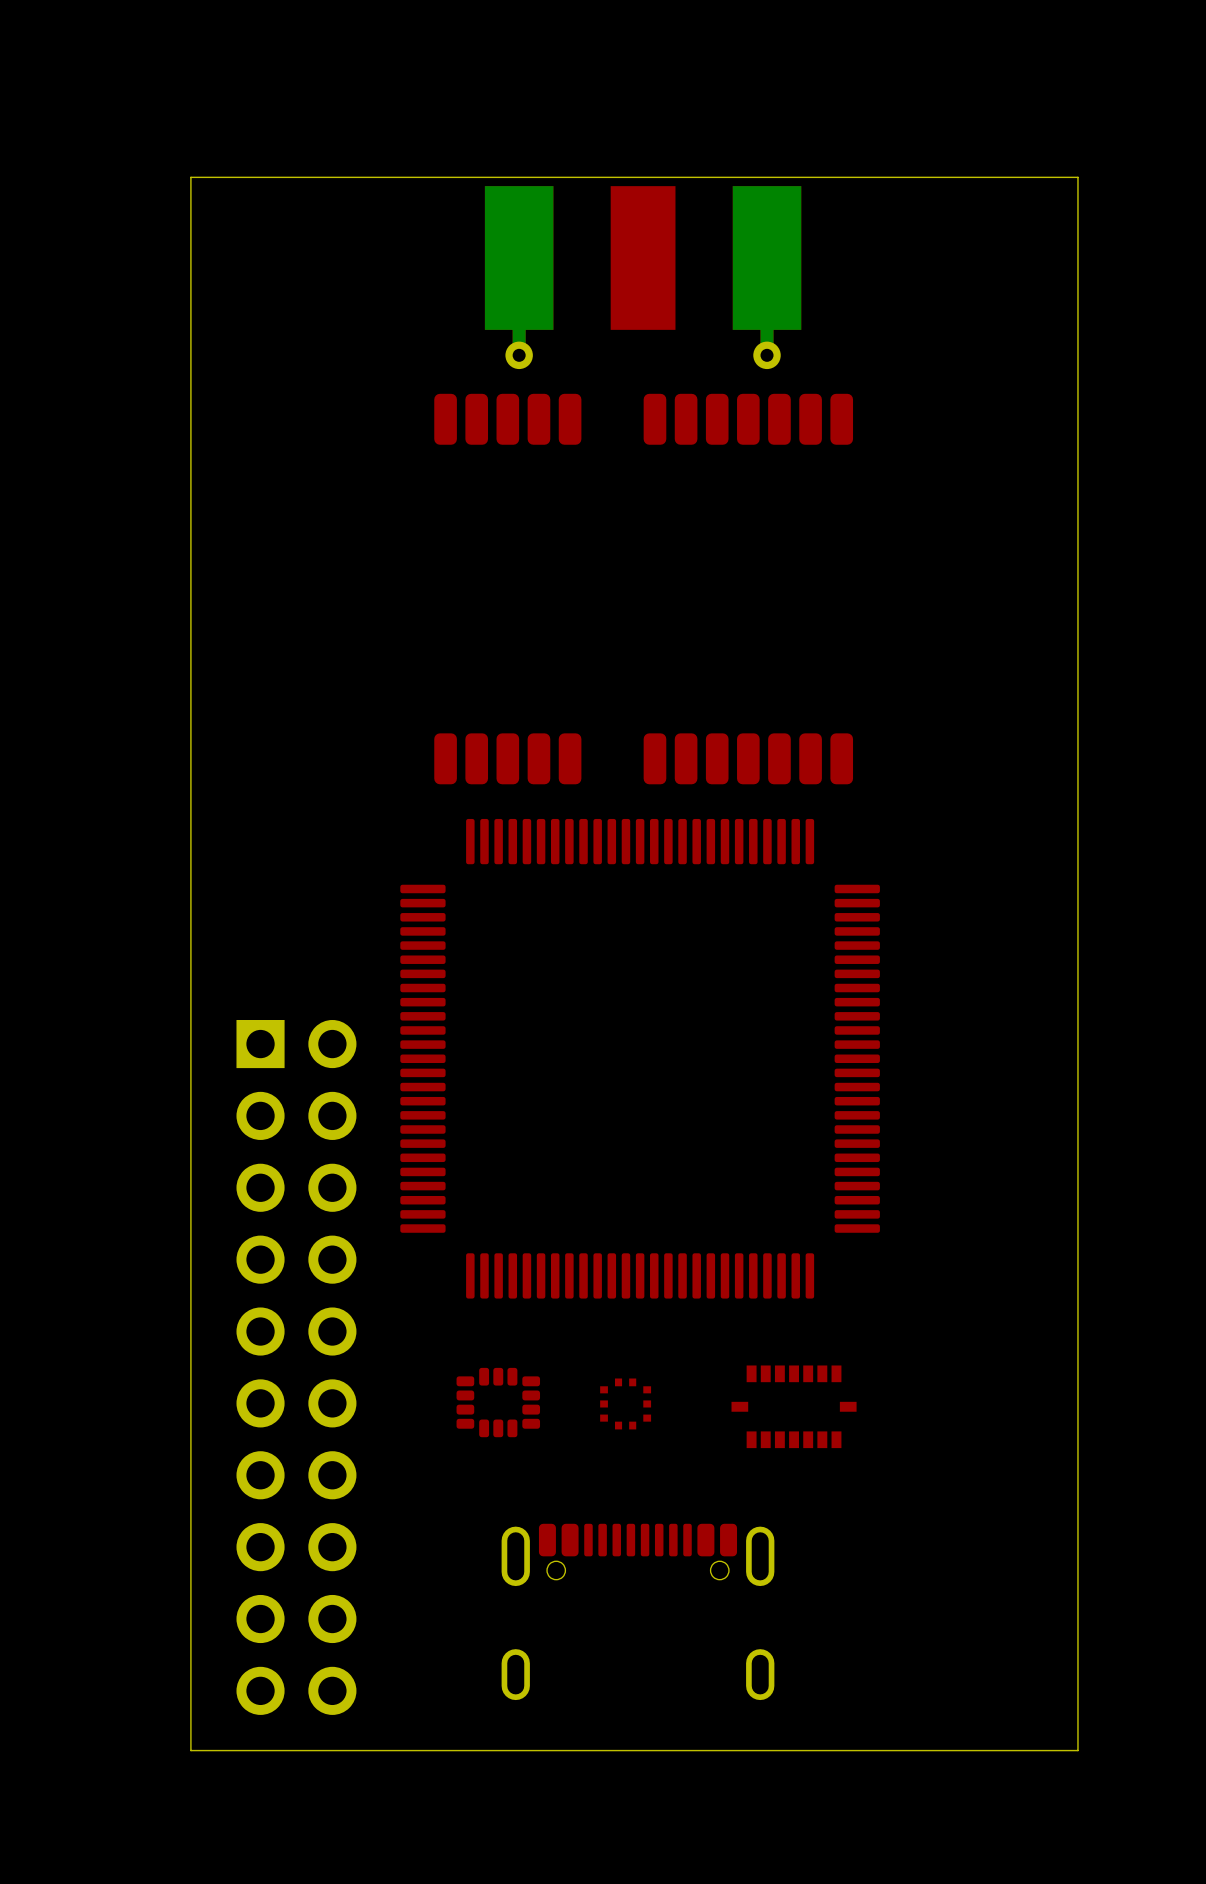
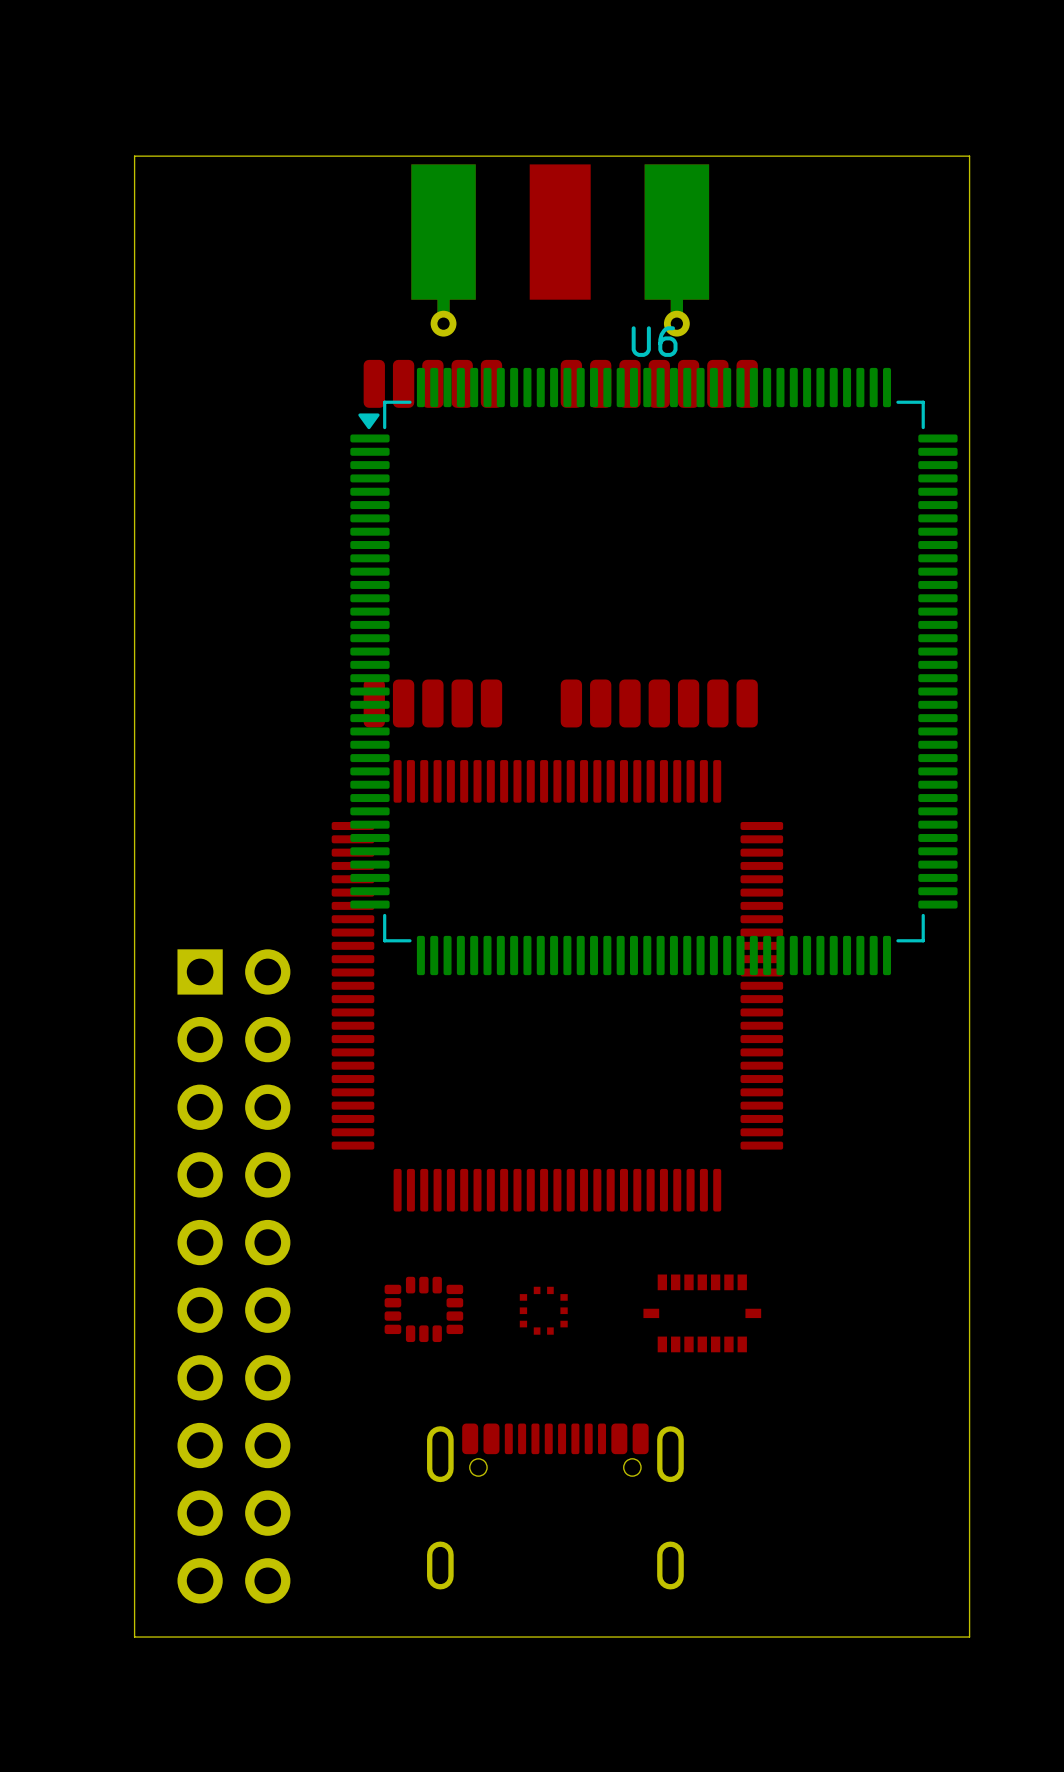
U6: none -> (653, 671)

